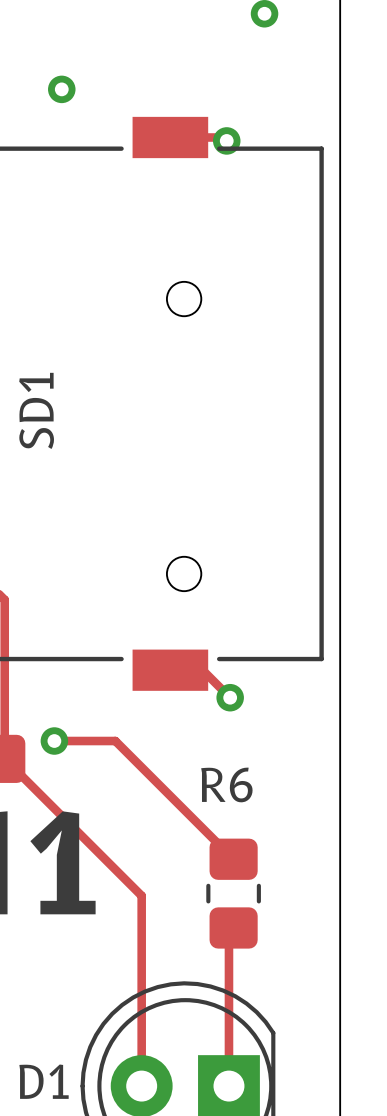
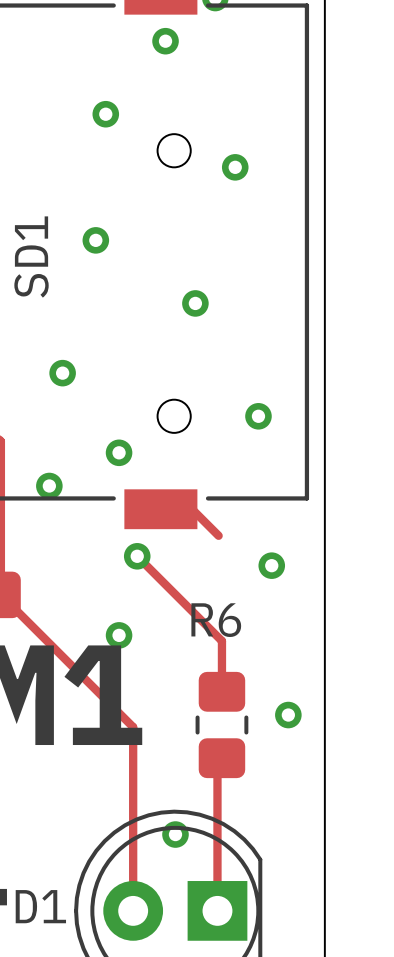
via: none -> (165, 41)
via: none -> (105, 114)
via: none -> (235, 167)
via: none -> (95, 240)
via: none -> (195, 303)
via: none -> (62, 373)
via: none -> (258, 416)
via: none -> (119, 452)
via: none -> (49, 486)
via: (230, 697) -> none
via: none -> (137, 556)
via: none -> (271, 565)
track: (54, 741) (115, 741) (233, 859) -> (137, 556) (221, 641) (221, 691)
via: (54, 741) -> none
via: none -> (119, 635)
via: none -> (288, 715)
via: none -> (175, 834)

